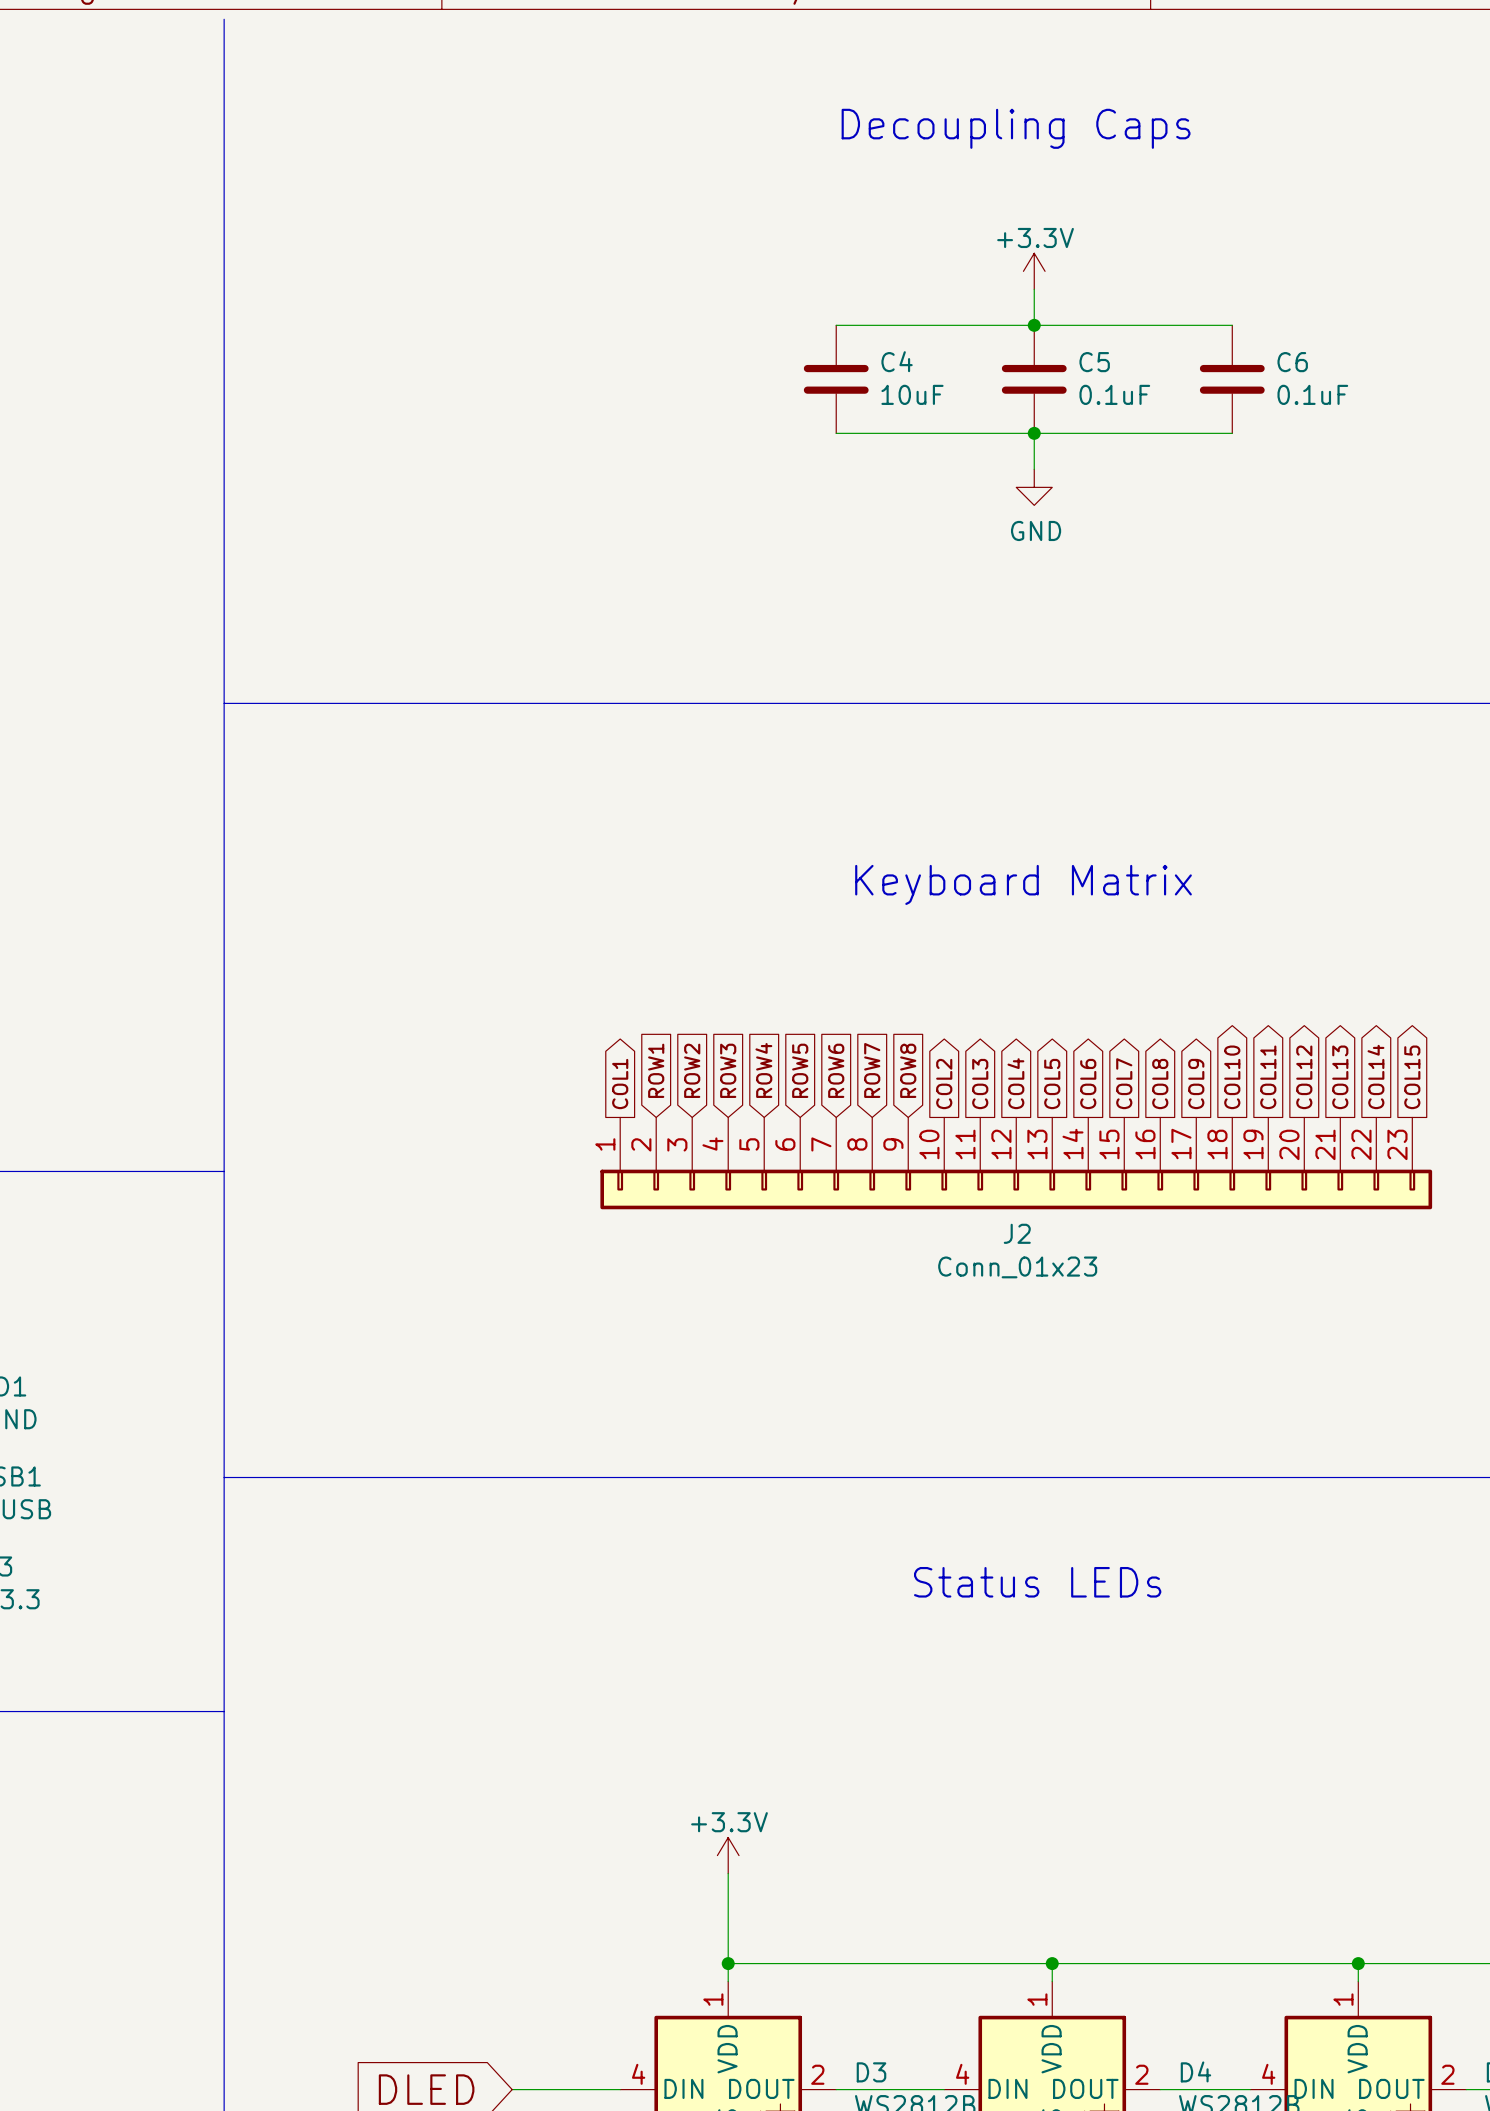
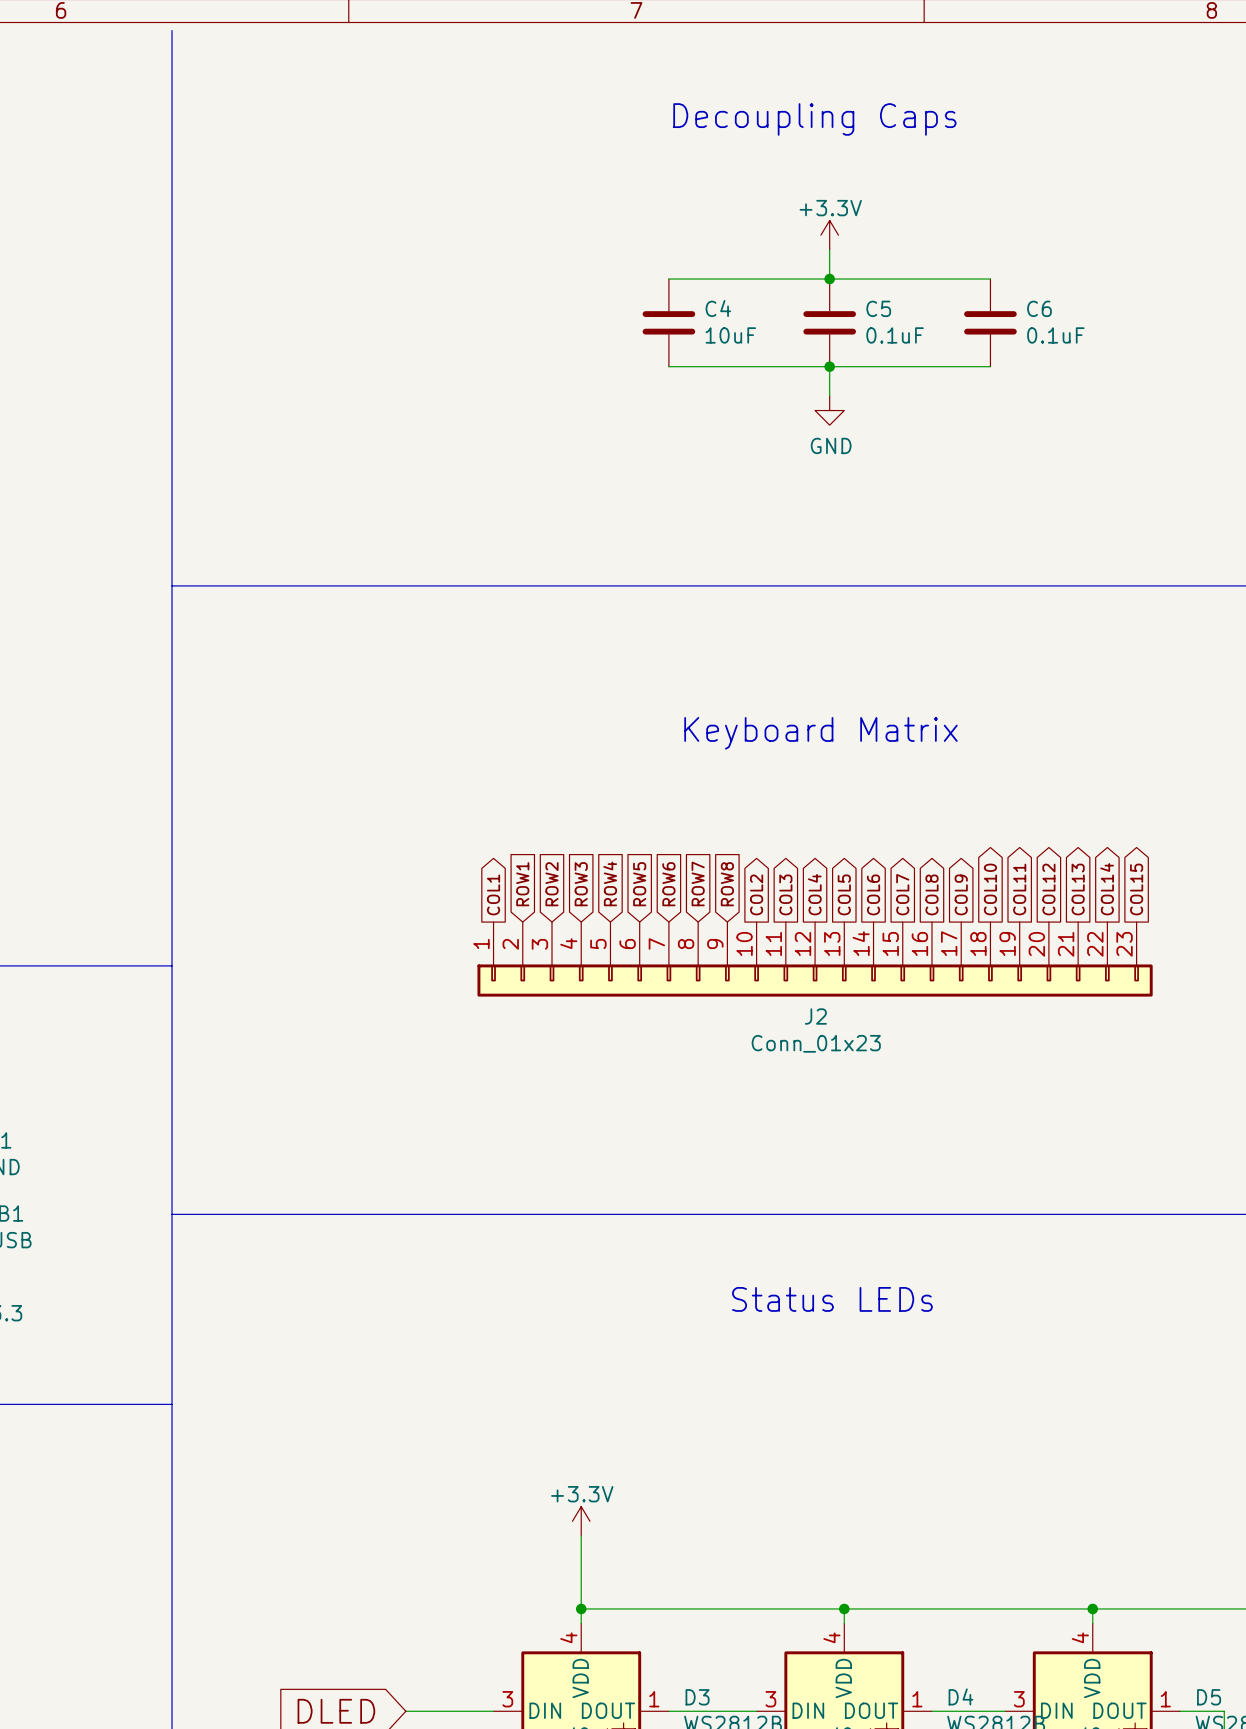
D3 pin number: 1 (713, 1999) -> 4 (568, 1637)
D4 pin number: 1 (1037, 1999) -> 4 (831, 1637)
D5 pin number: 1 (1343, 1999) -> 4 (1080, 1637)
D3 pin number: 4 (638, 2074) -> 3 (507, 1699)
D3 pin number: 2 (817, 2074) -> 1 (654, 1699)
D4 pin number: 4 (962, 2074) -> 3 (770, 1699)
D4 pin number: 2 (1141, 2074) -> 1 (917, 1699)
D5 pin number: 4 (1268, 2074) -> 3 (1019, 1699)
D5 pin number: 2 (1447, 2074) -> 1 (1165, 1699)

